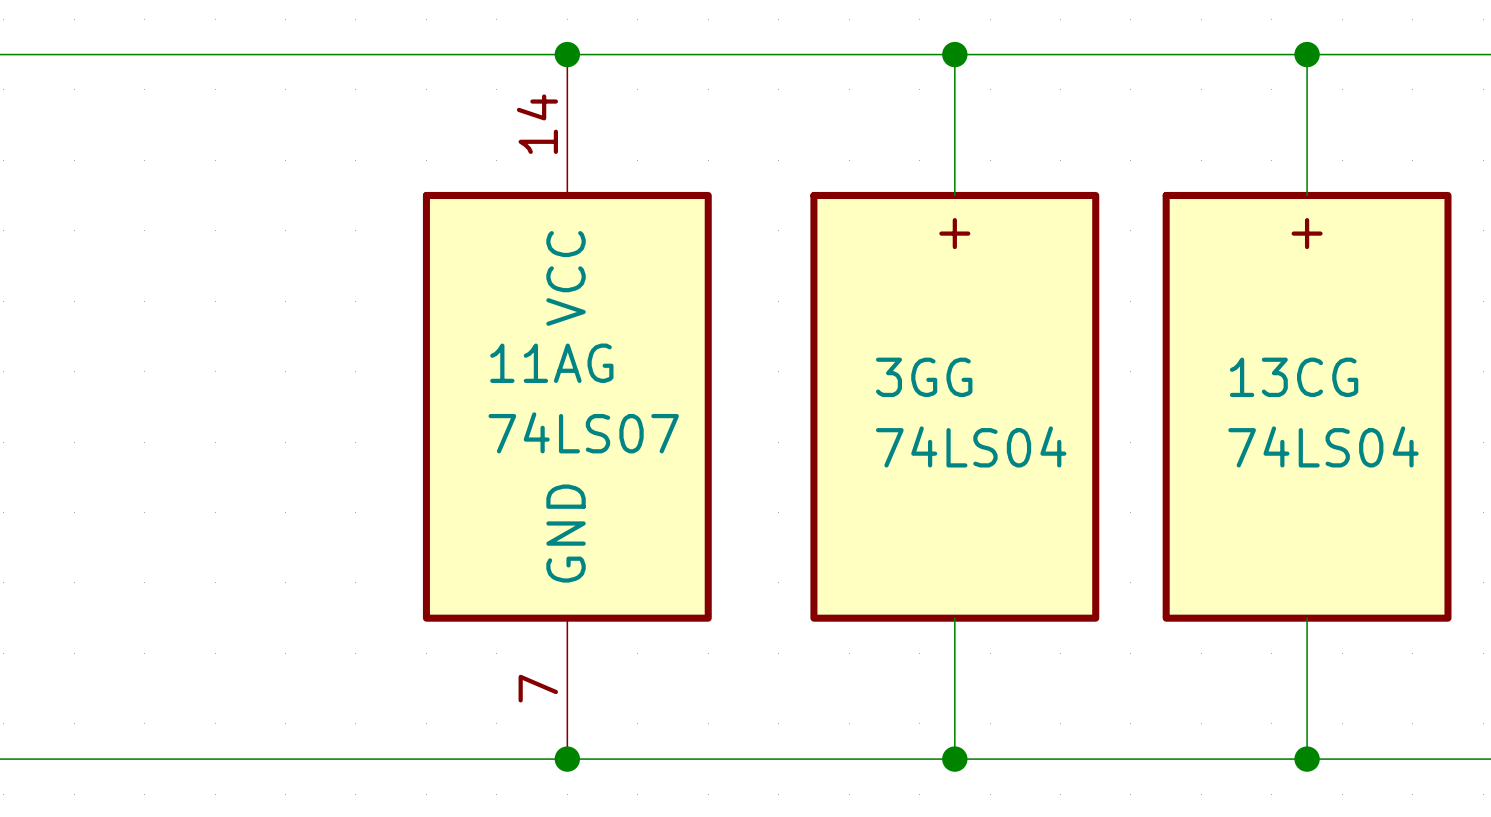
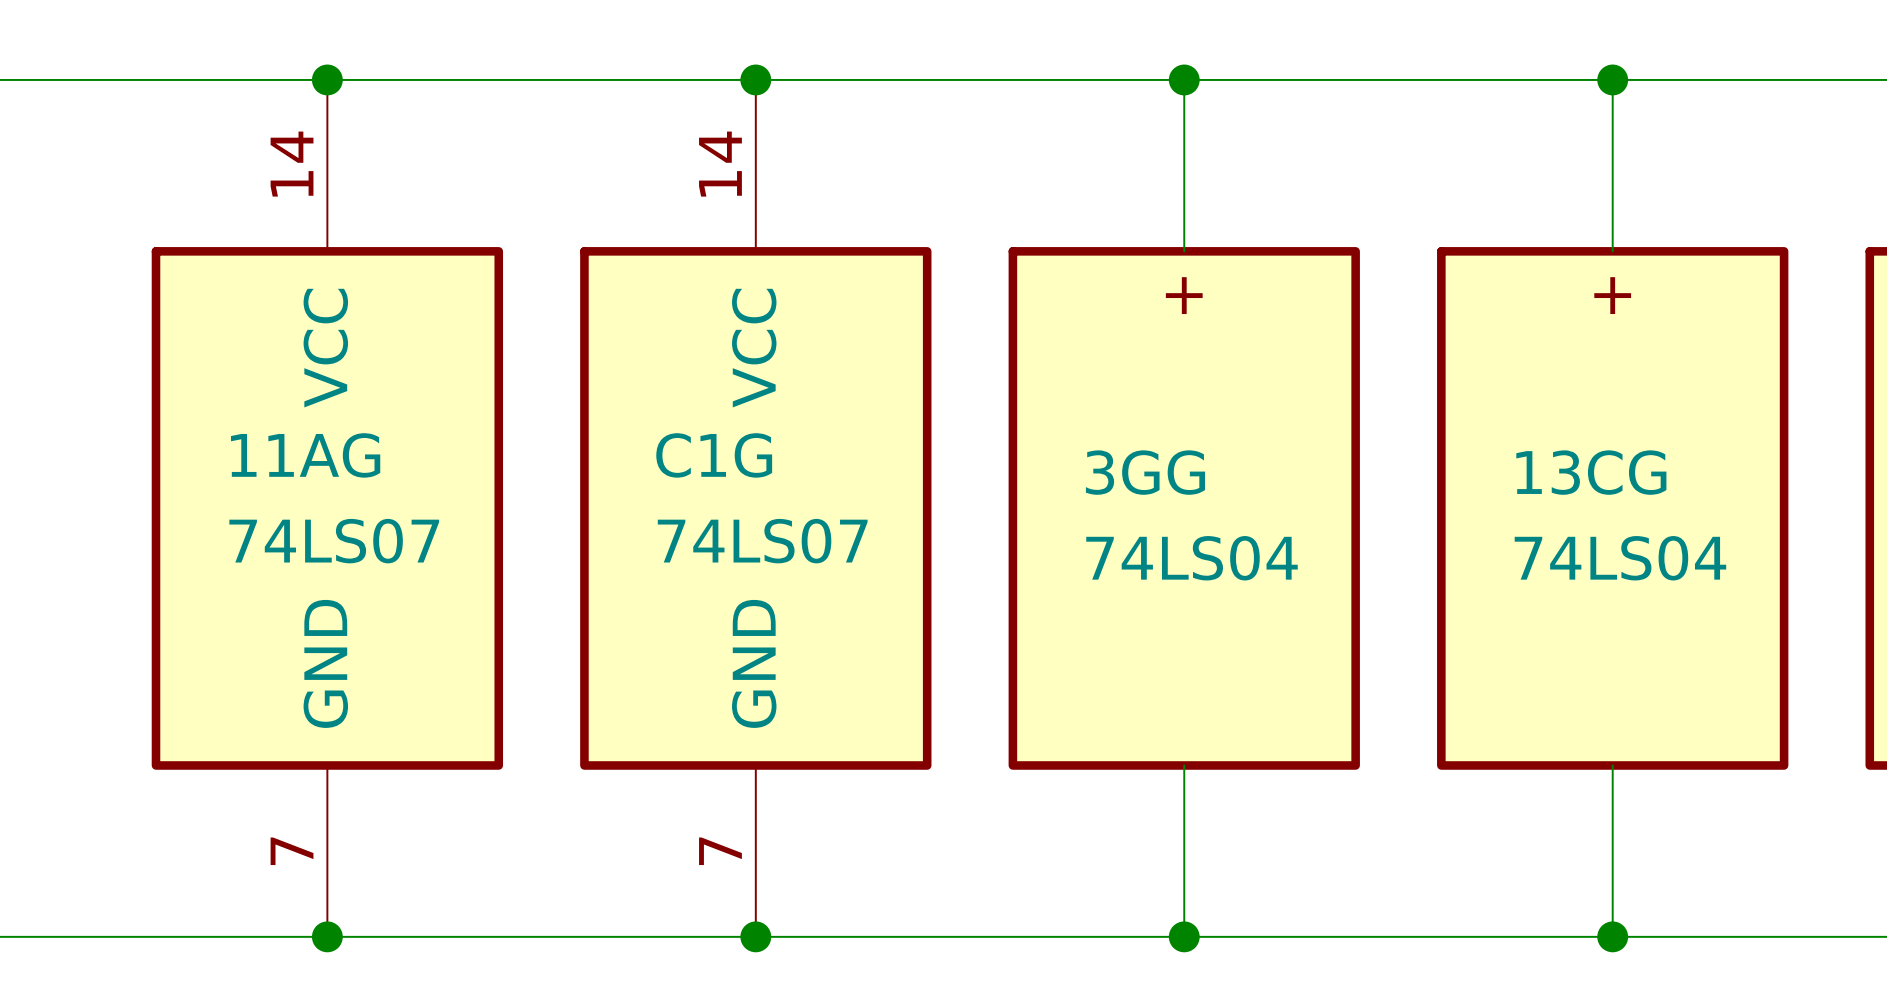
junction: none -> (327, 79)
junction position: (567, 54) -> (755, 79)
11AG position: (567, 406) -> (327, 508)
C1G: none -> 74LS07 (755, 508)
junction: none -> (327, 936)
junction position: (567, 759) -> (755, 936)

